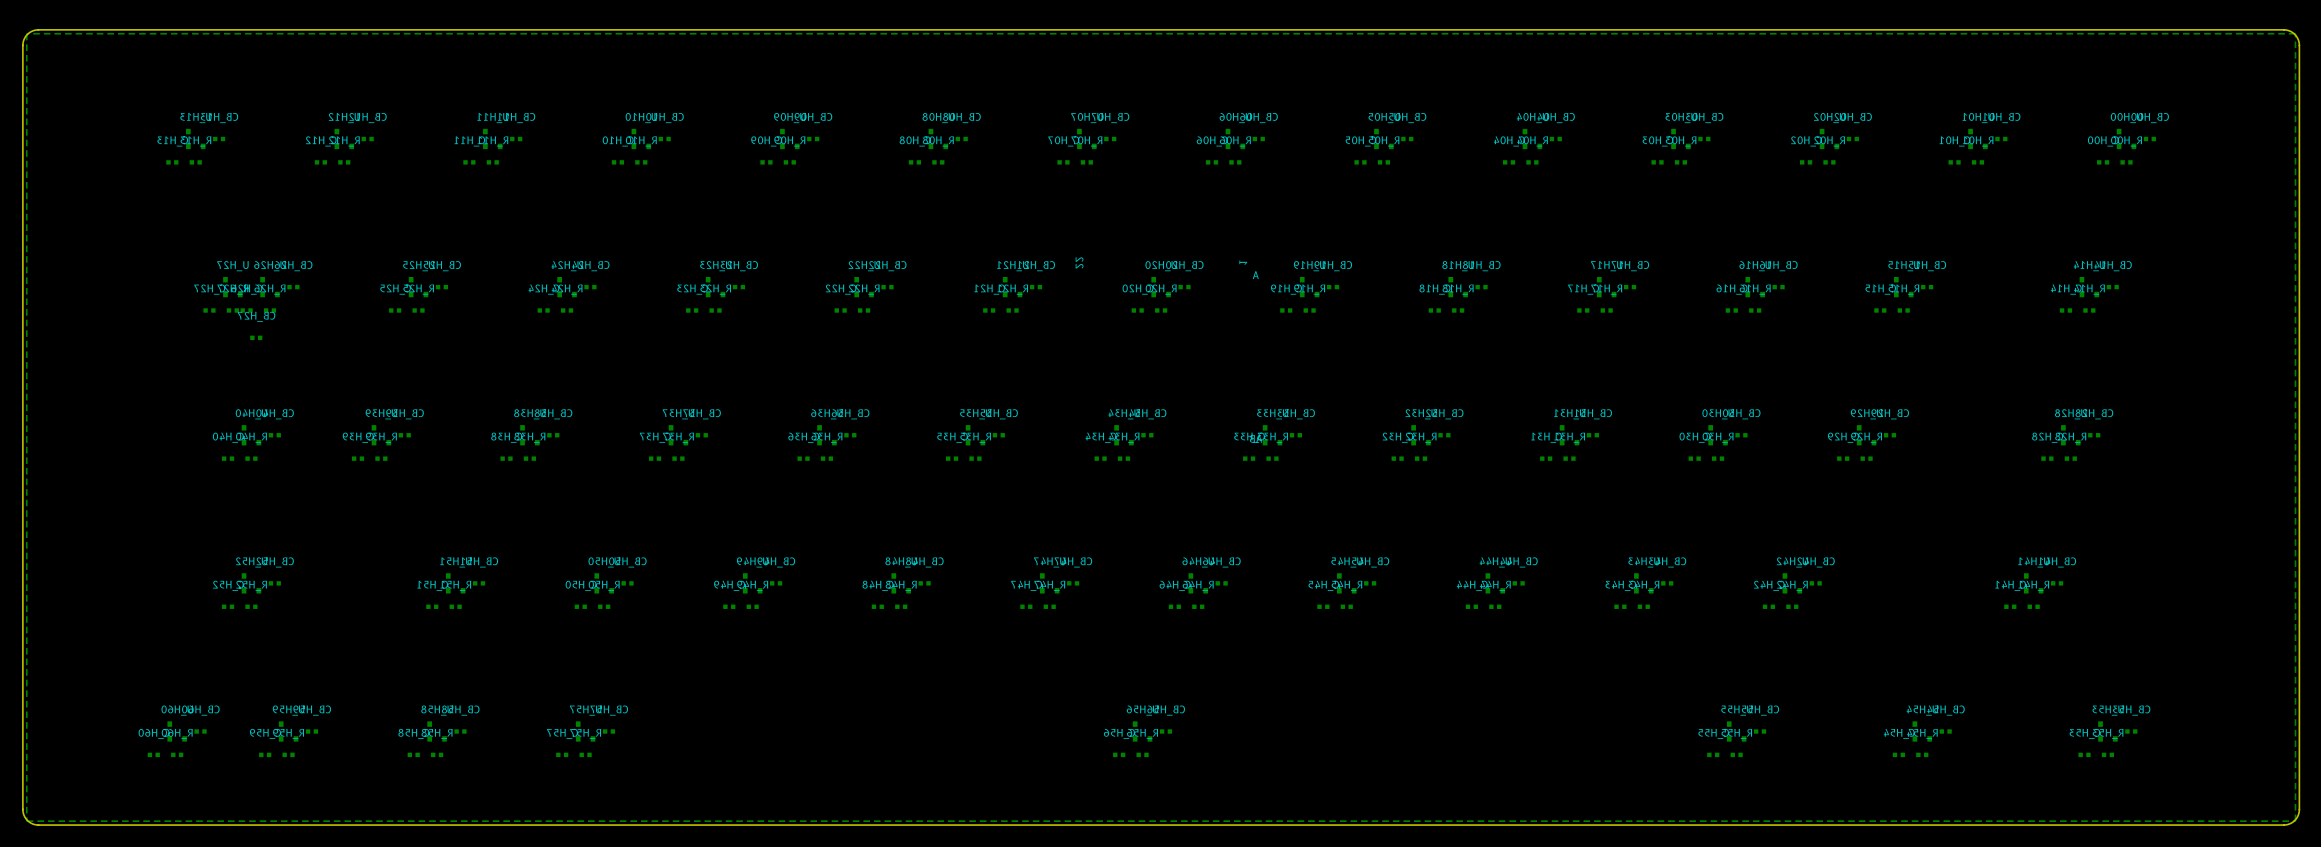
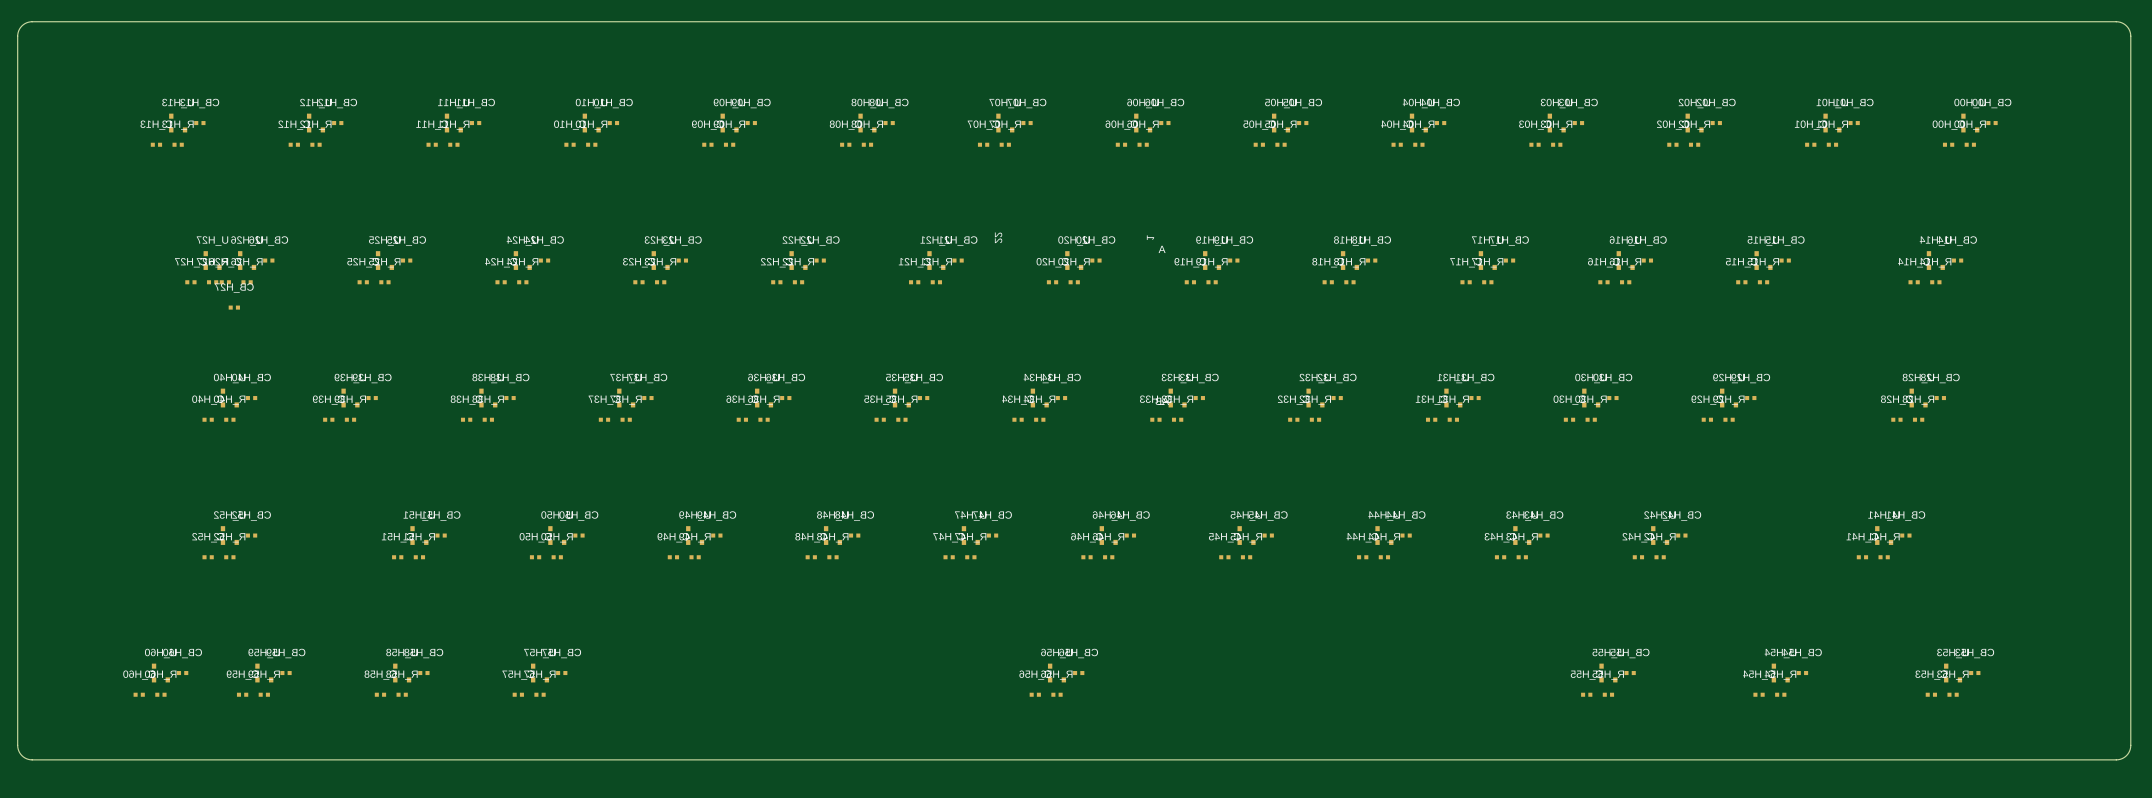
zone outline: (2295, 33) (26, 33) (26, 821) (2295, 821) (2295, 33) -> none

